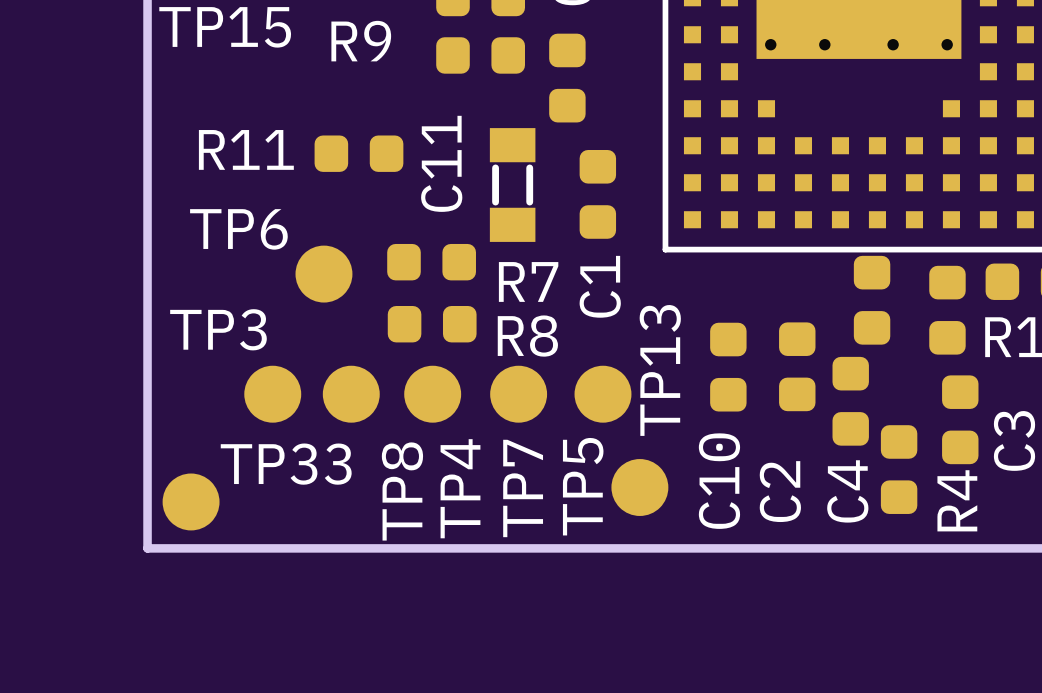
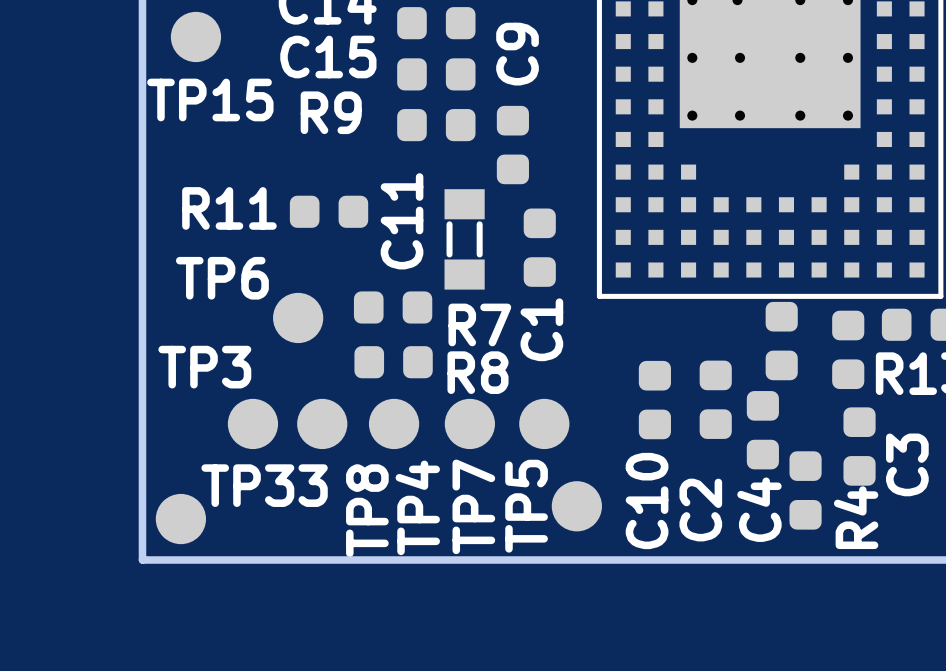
text: TP13 (660, 370) -> none

